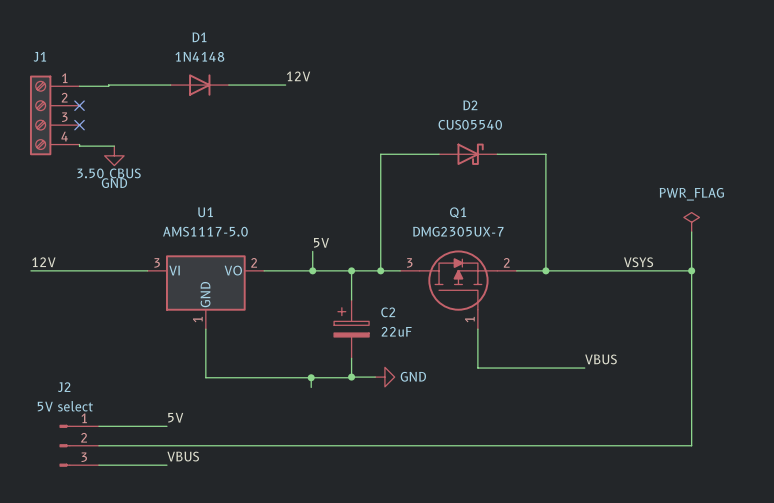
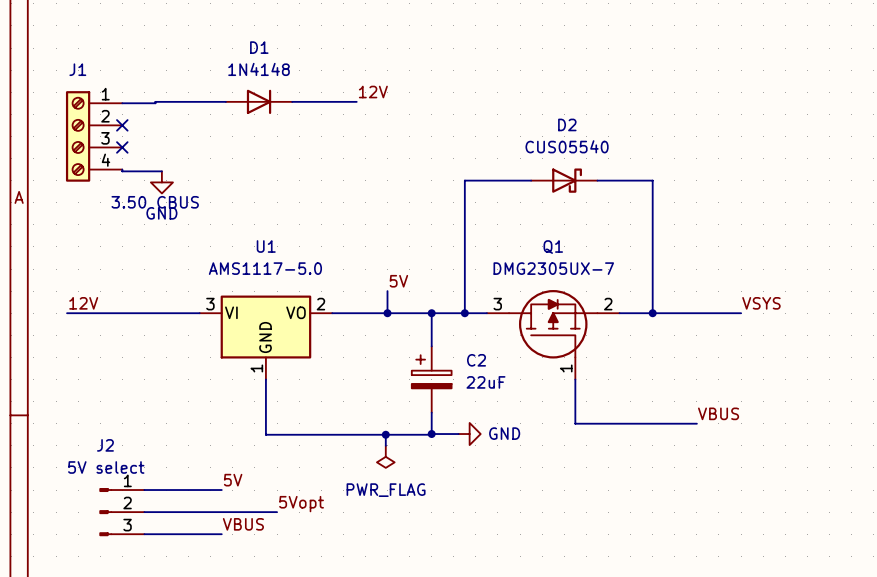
power symbol: PWR_FLAG (691, 222) -> none
wire: (691, 232) (691, 445) (215, 445) -> none
wire: (623, 270) (691, 270) -> none
junction: (691, 270) -> none
power symbol: none -> PWR_FLAG (385, 456)
label: none -> 5Vopt (301, 504)

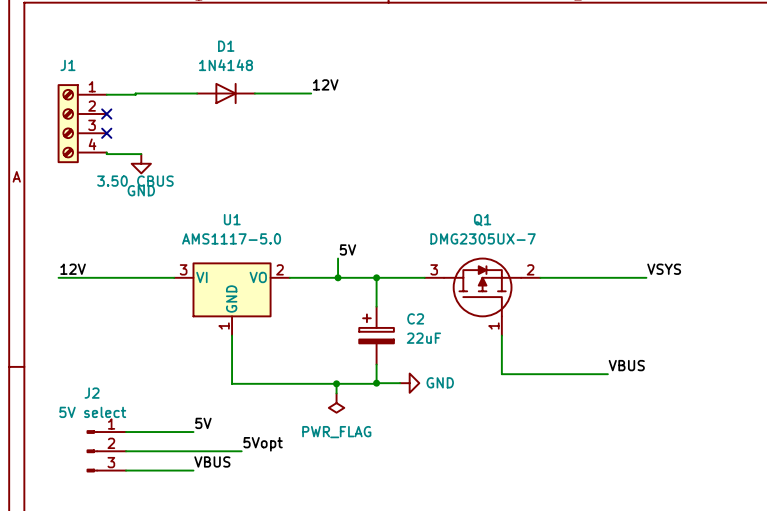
wire: (531, 180) (464, 180) (464, 313) -> none
D2: CUS05540 (564, 180) -> none
wire: (597, 180) (652, 180) (652, 313) -> none
junction: (464, 313) -> none
junction: (652, 313) -> none

